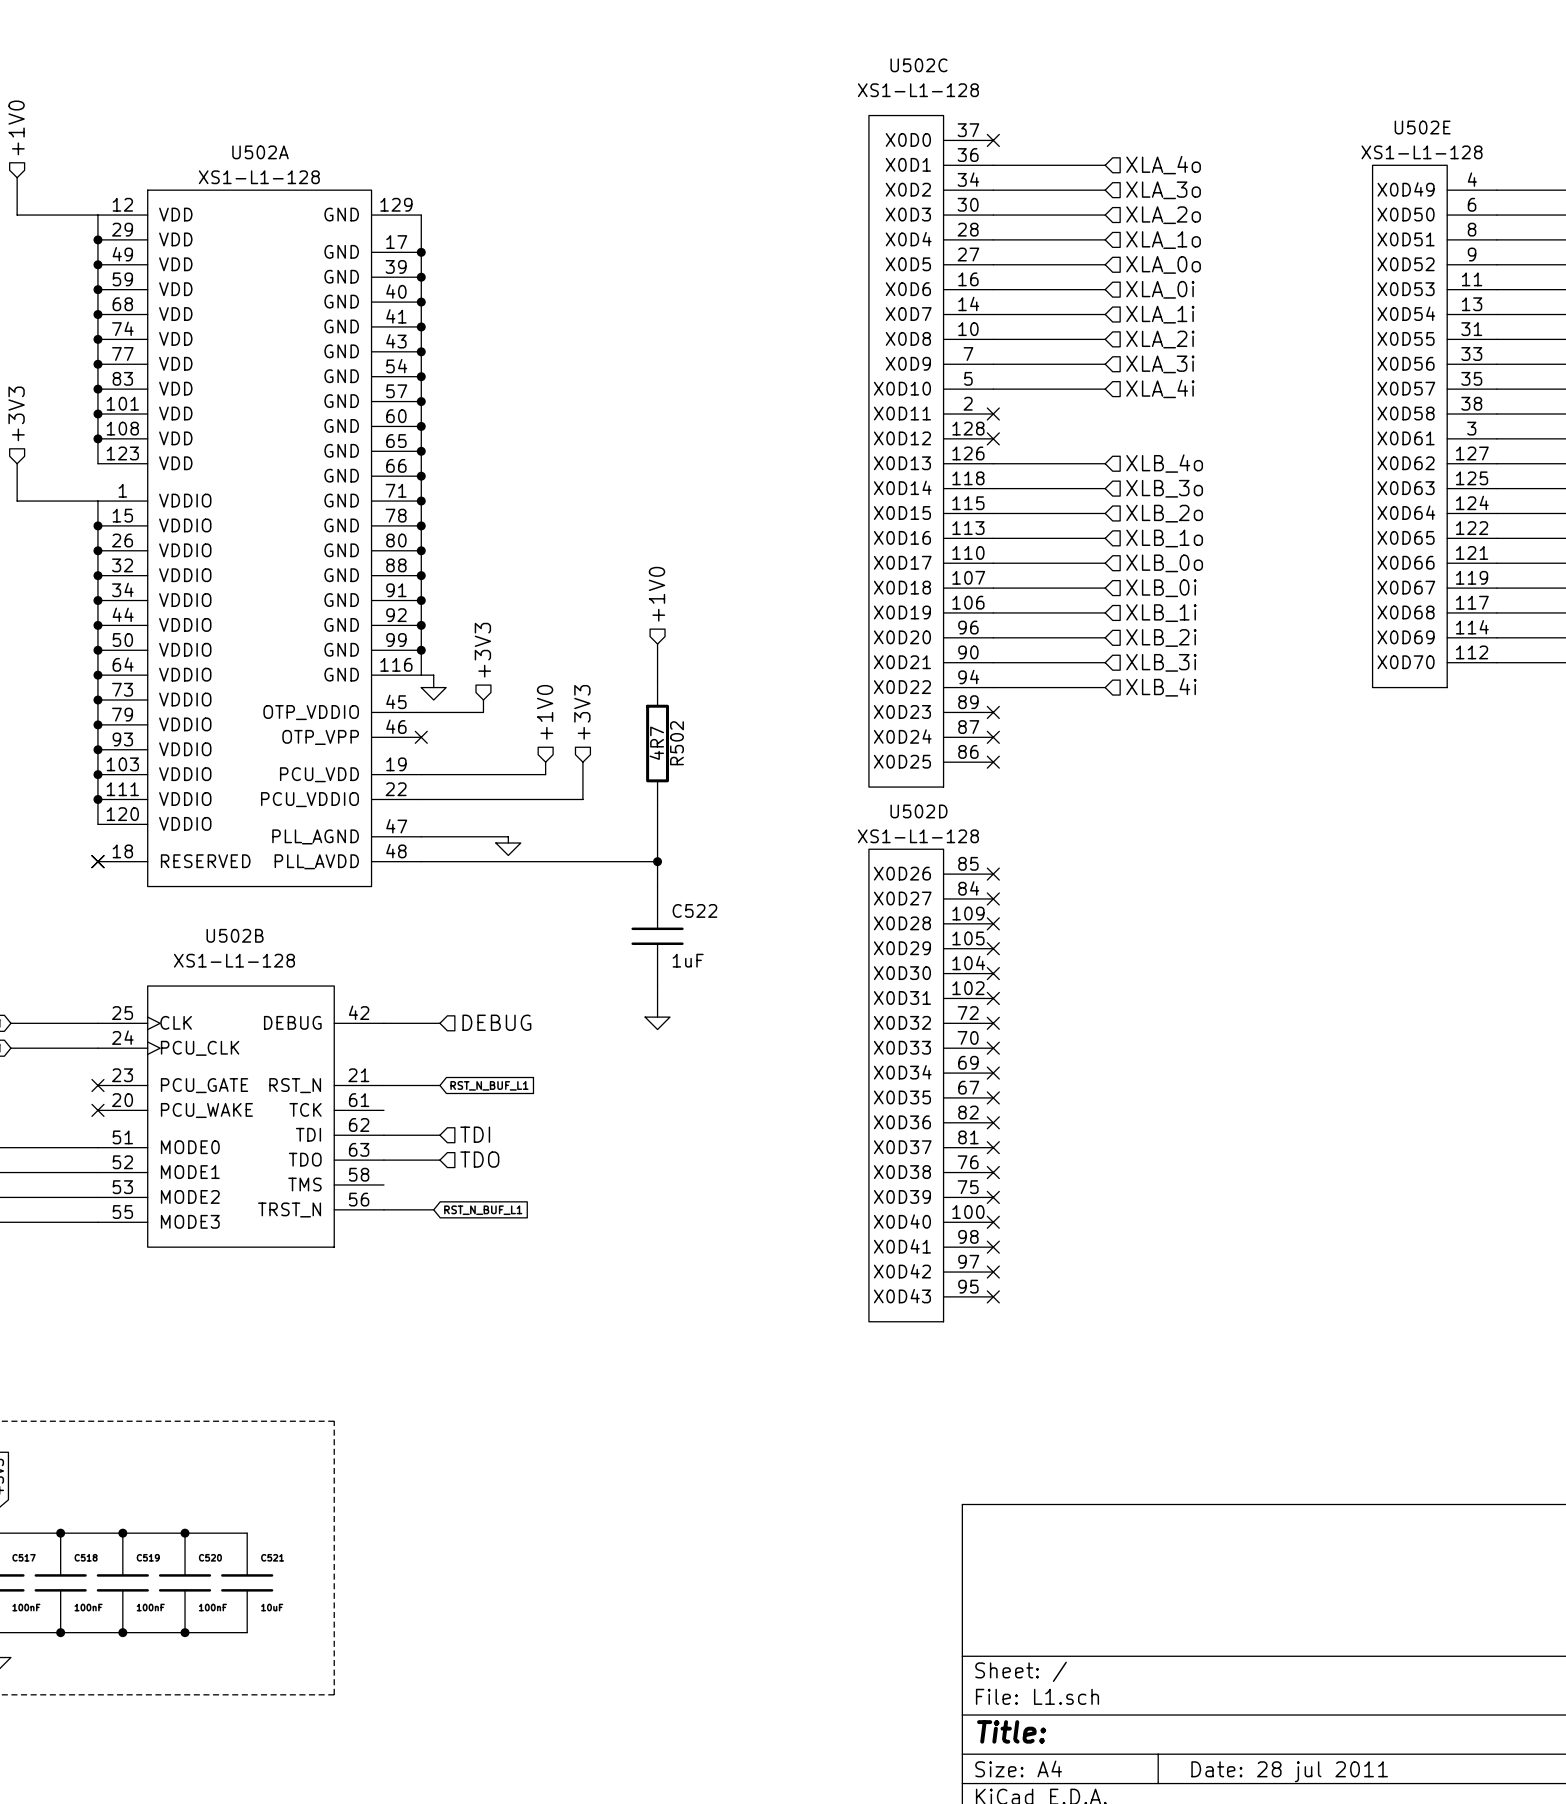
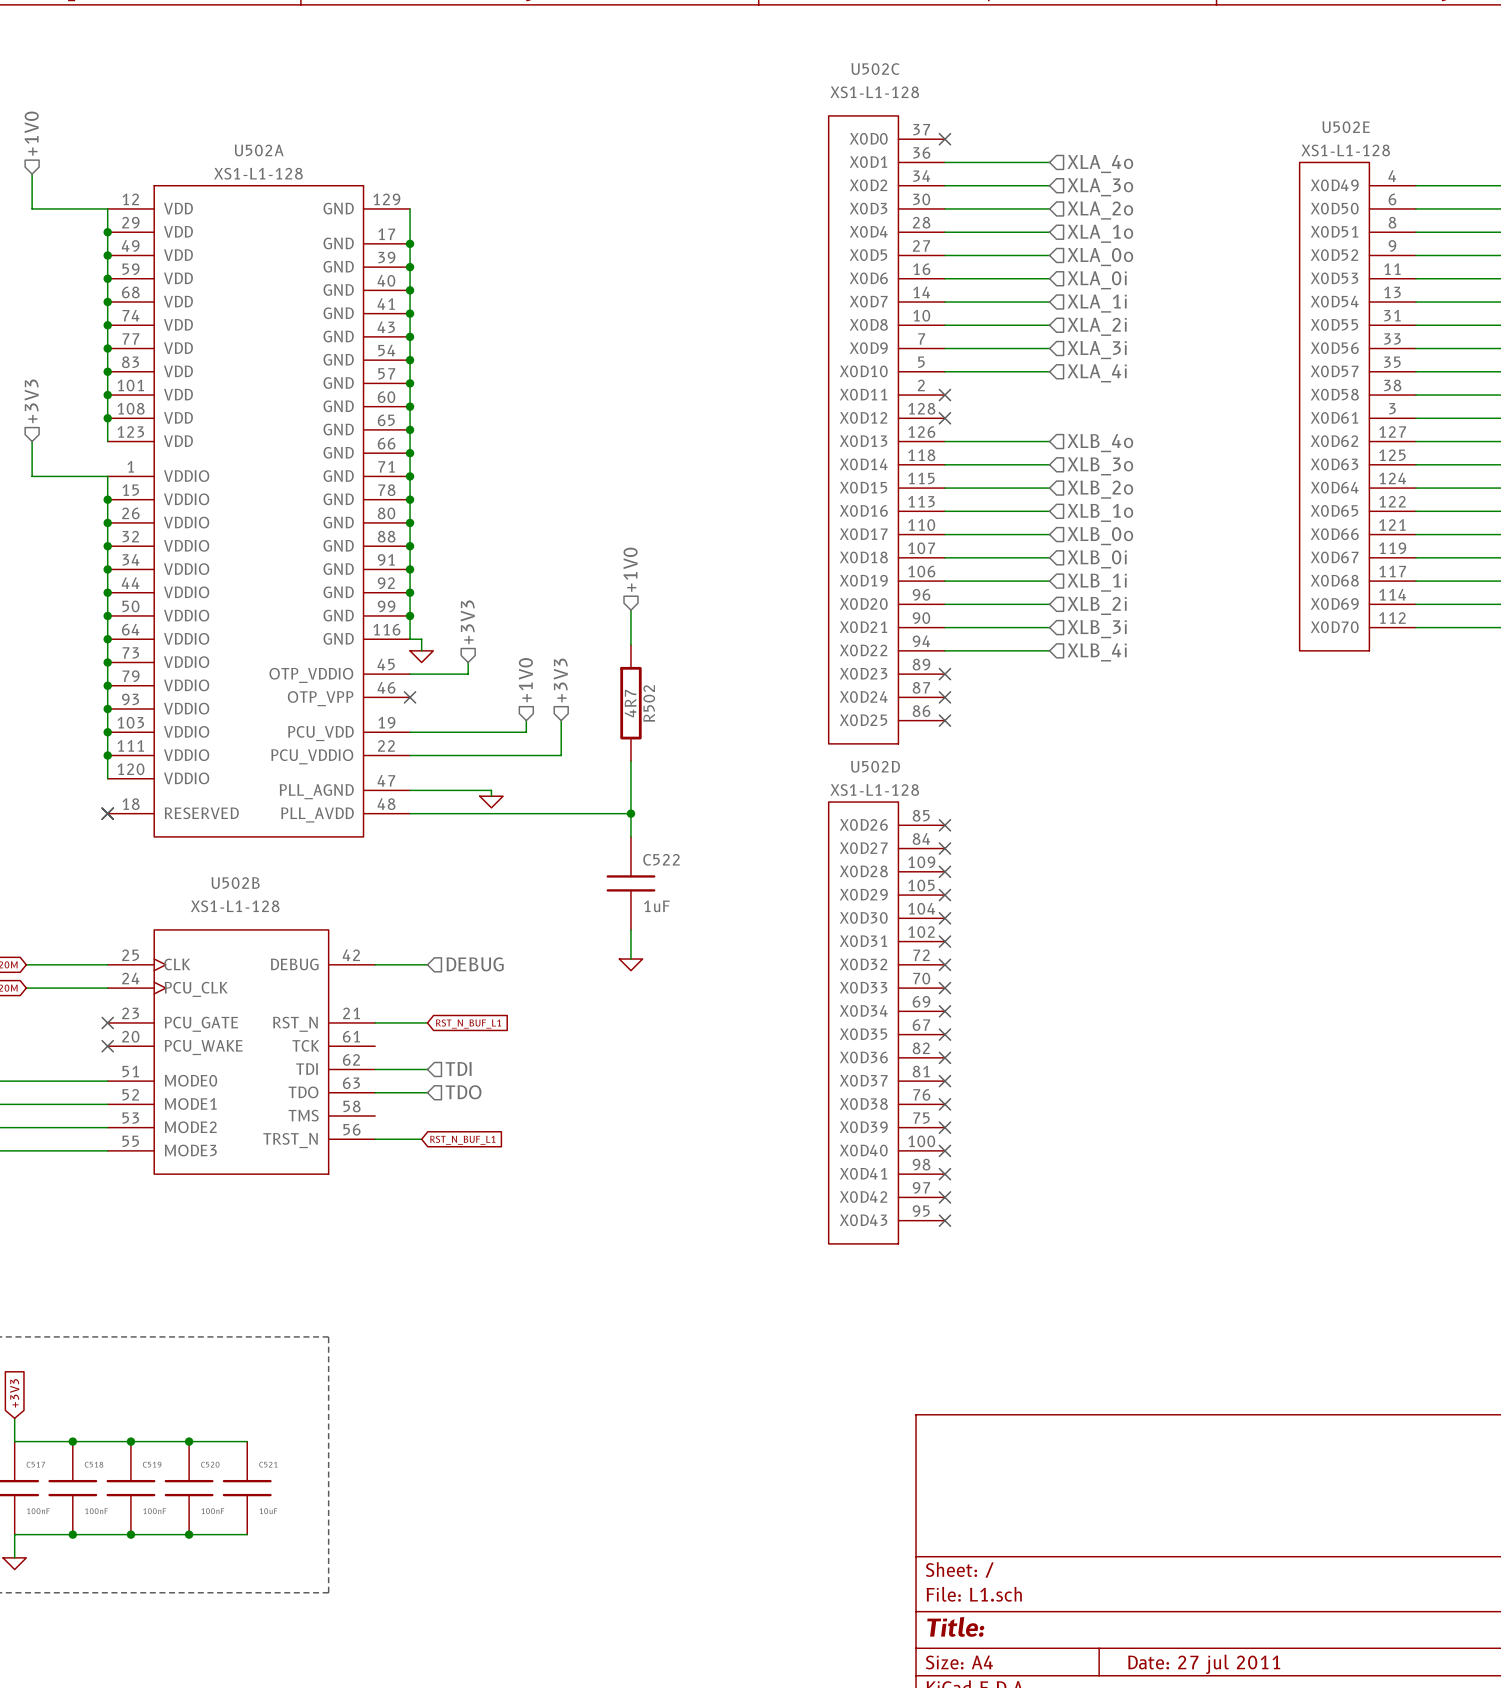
title block: Date: 28 jul 2011 (1289, 1771) -> Date: 27 jul 2011 (1204, 1664)

